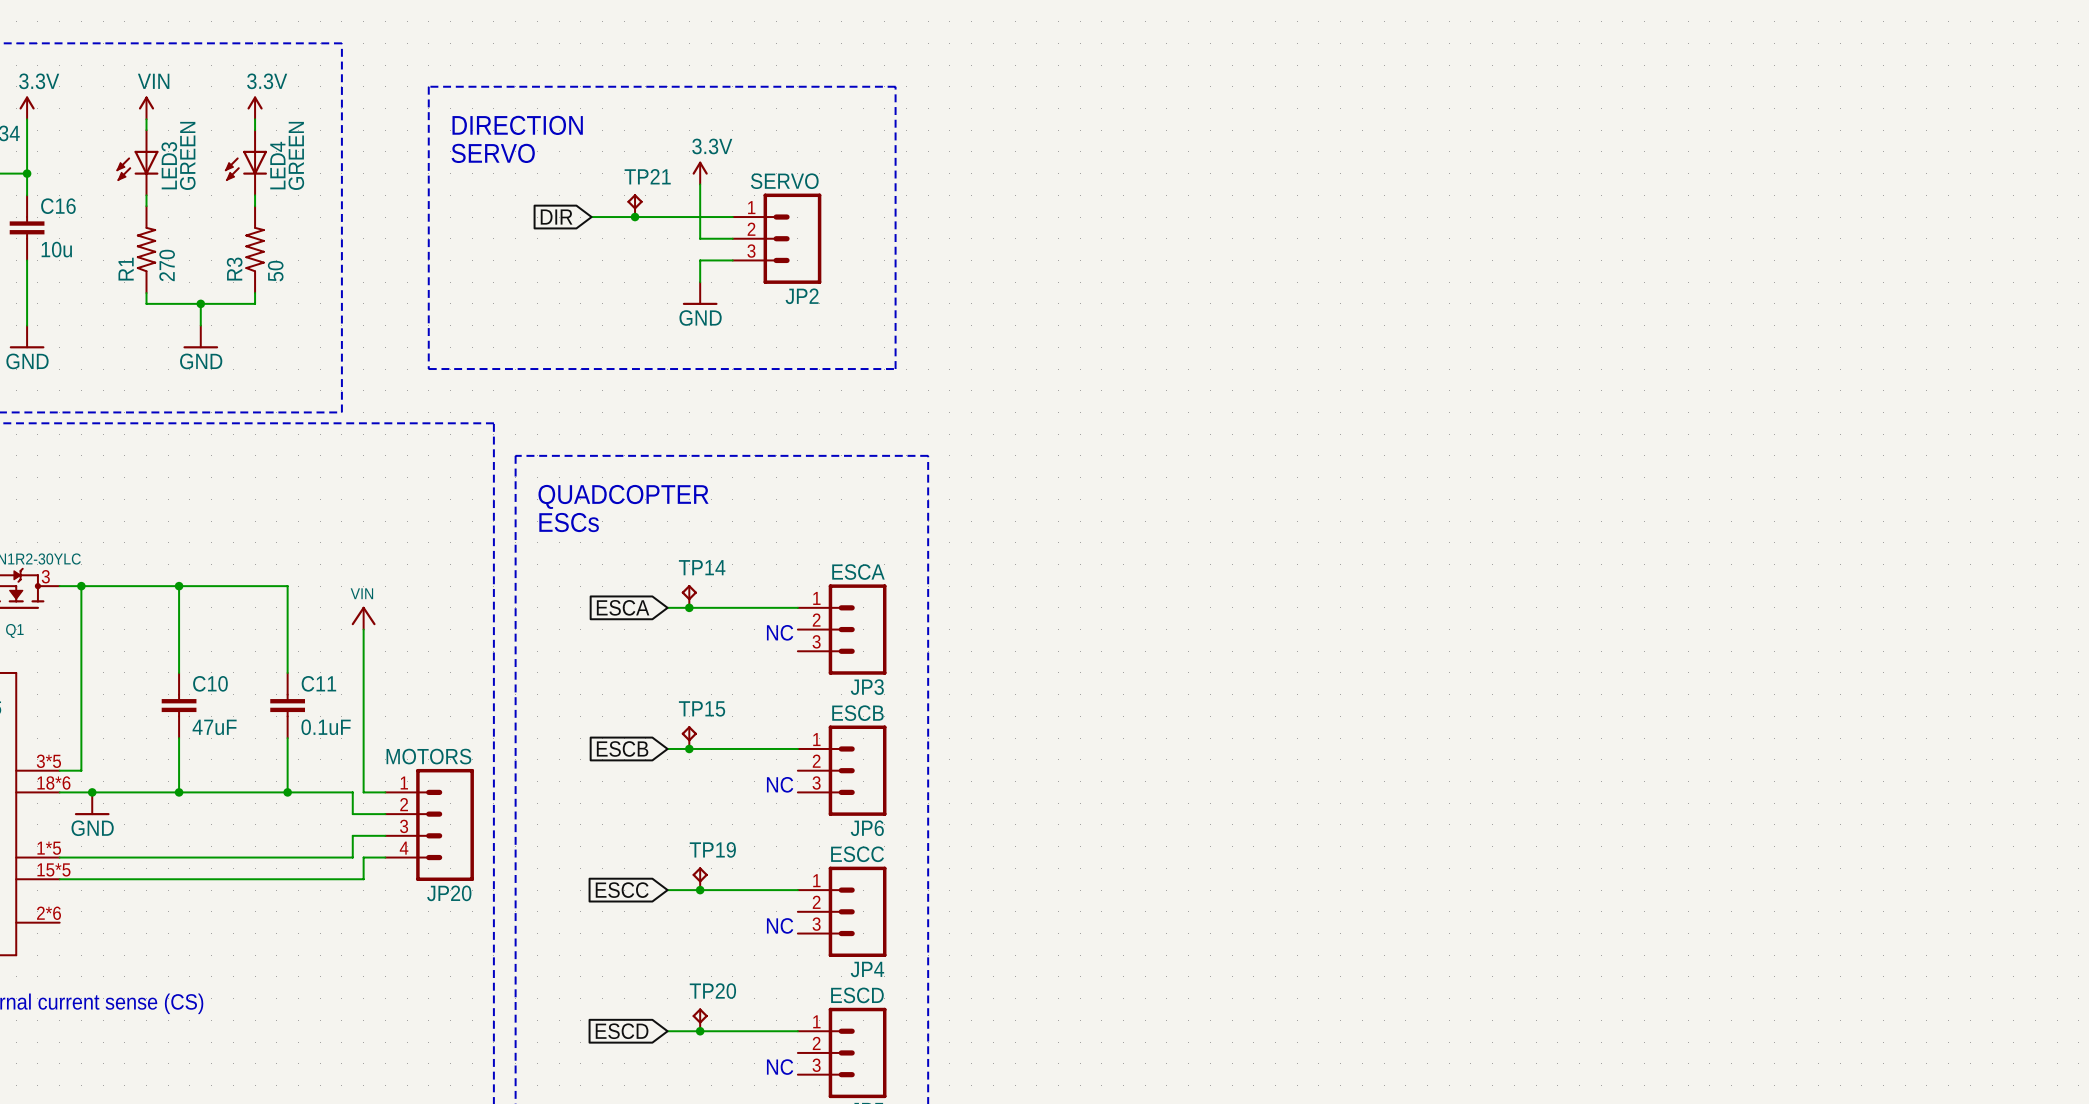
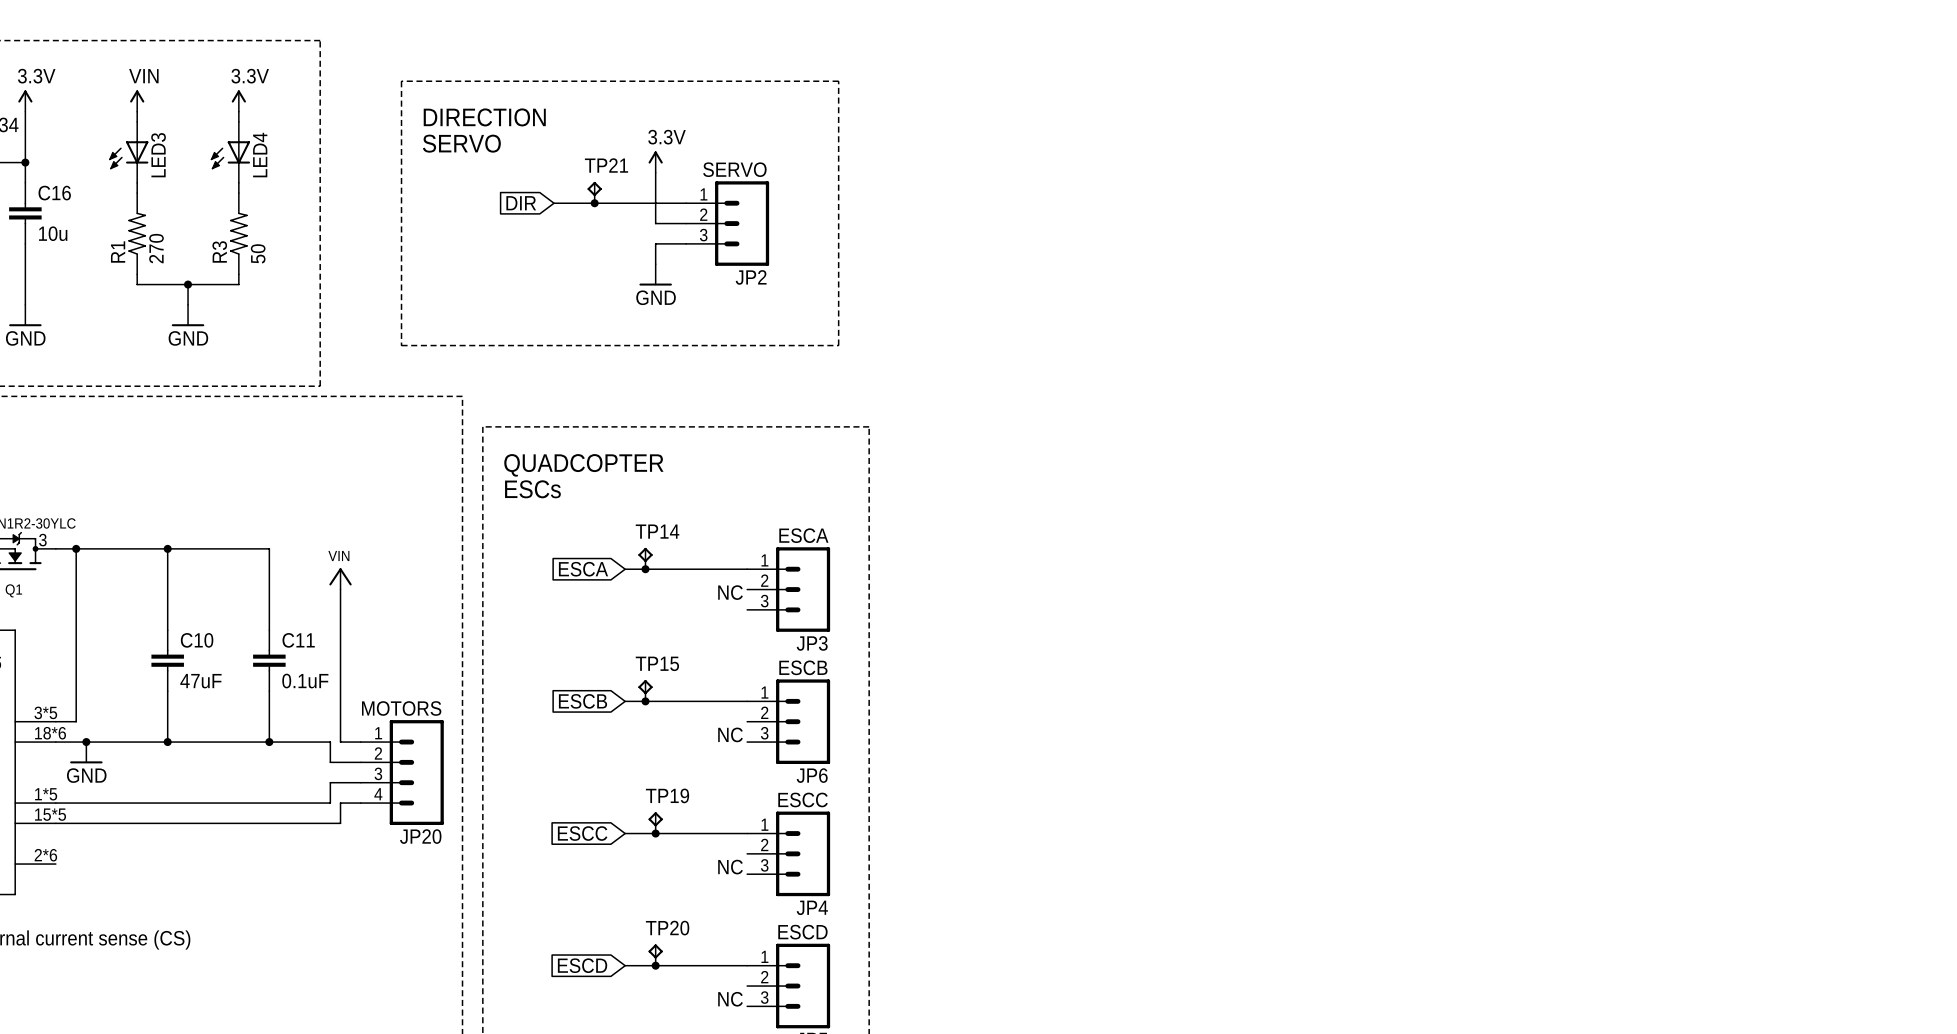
LED3 value: GREEN (187, 155) -> none
LED4 value: GREEN (296, 155) -> none

